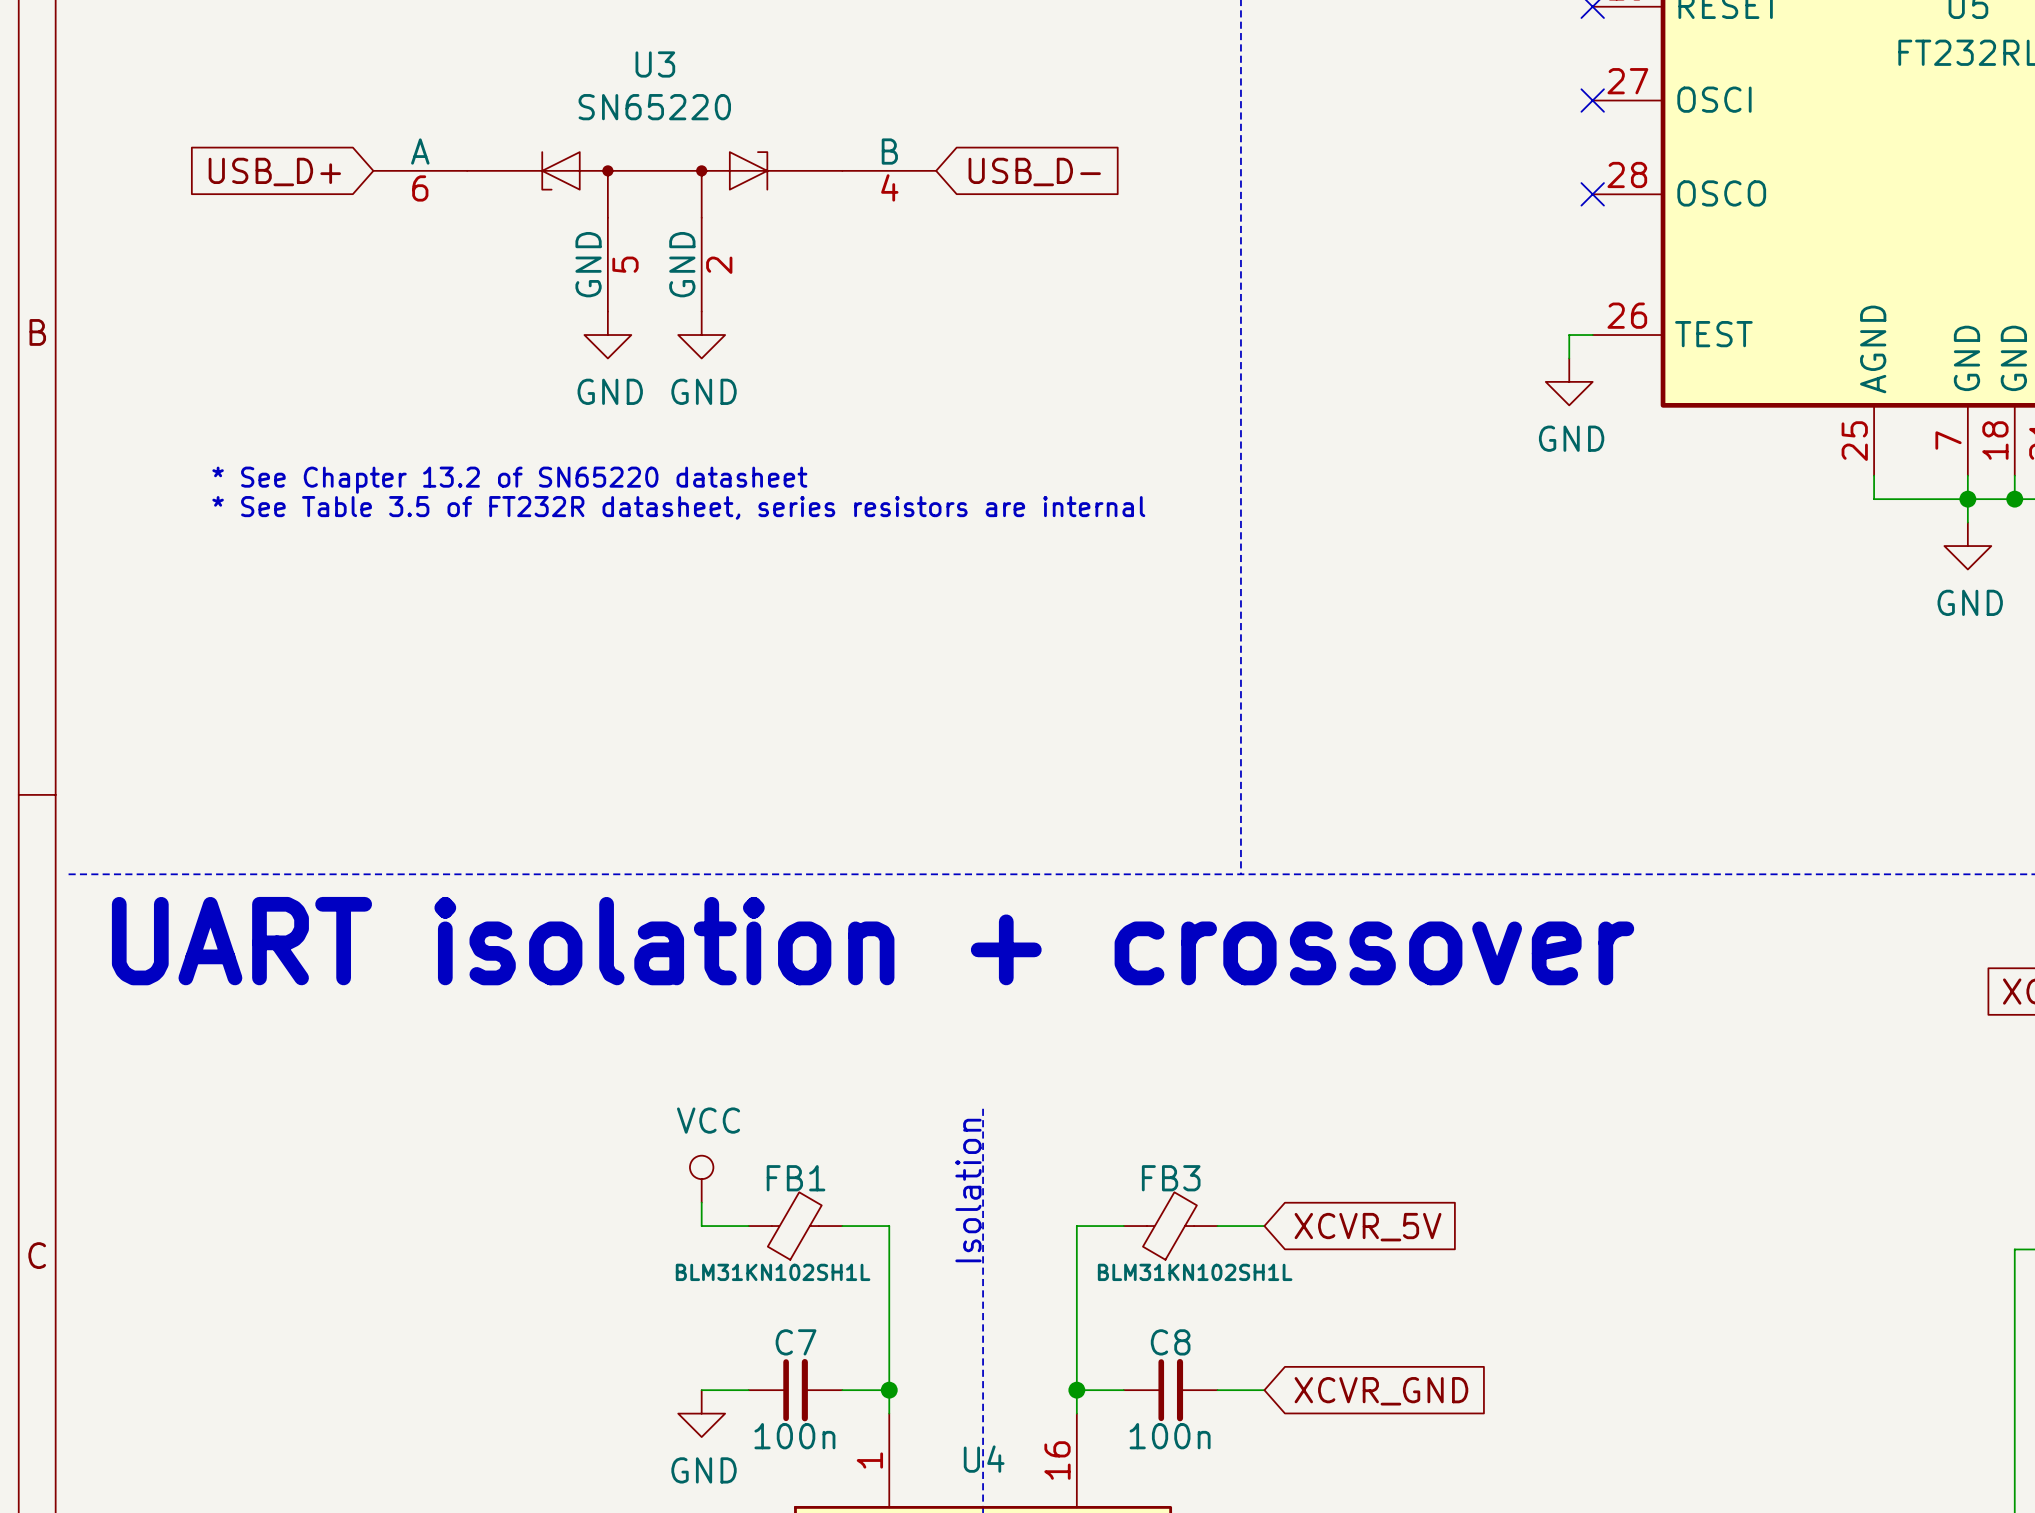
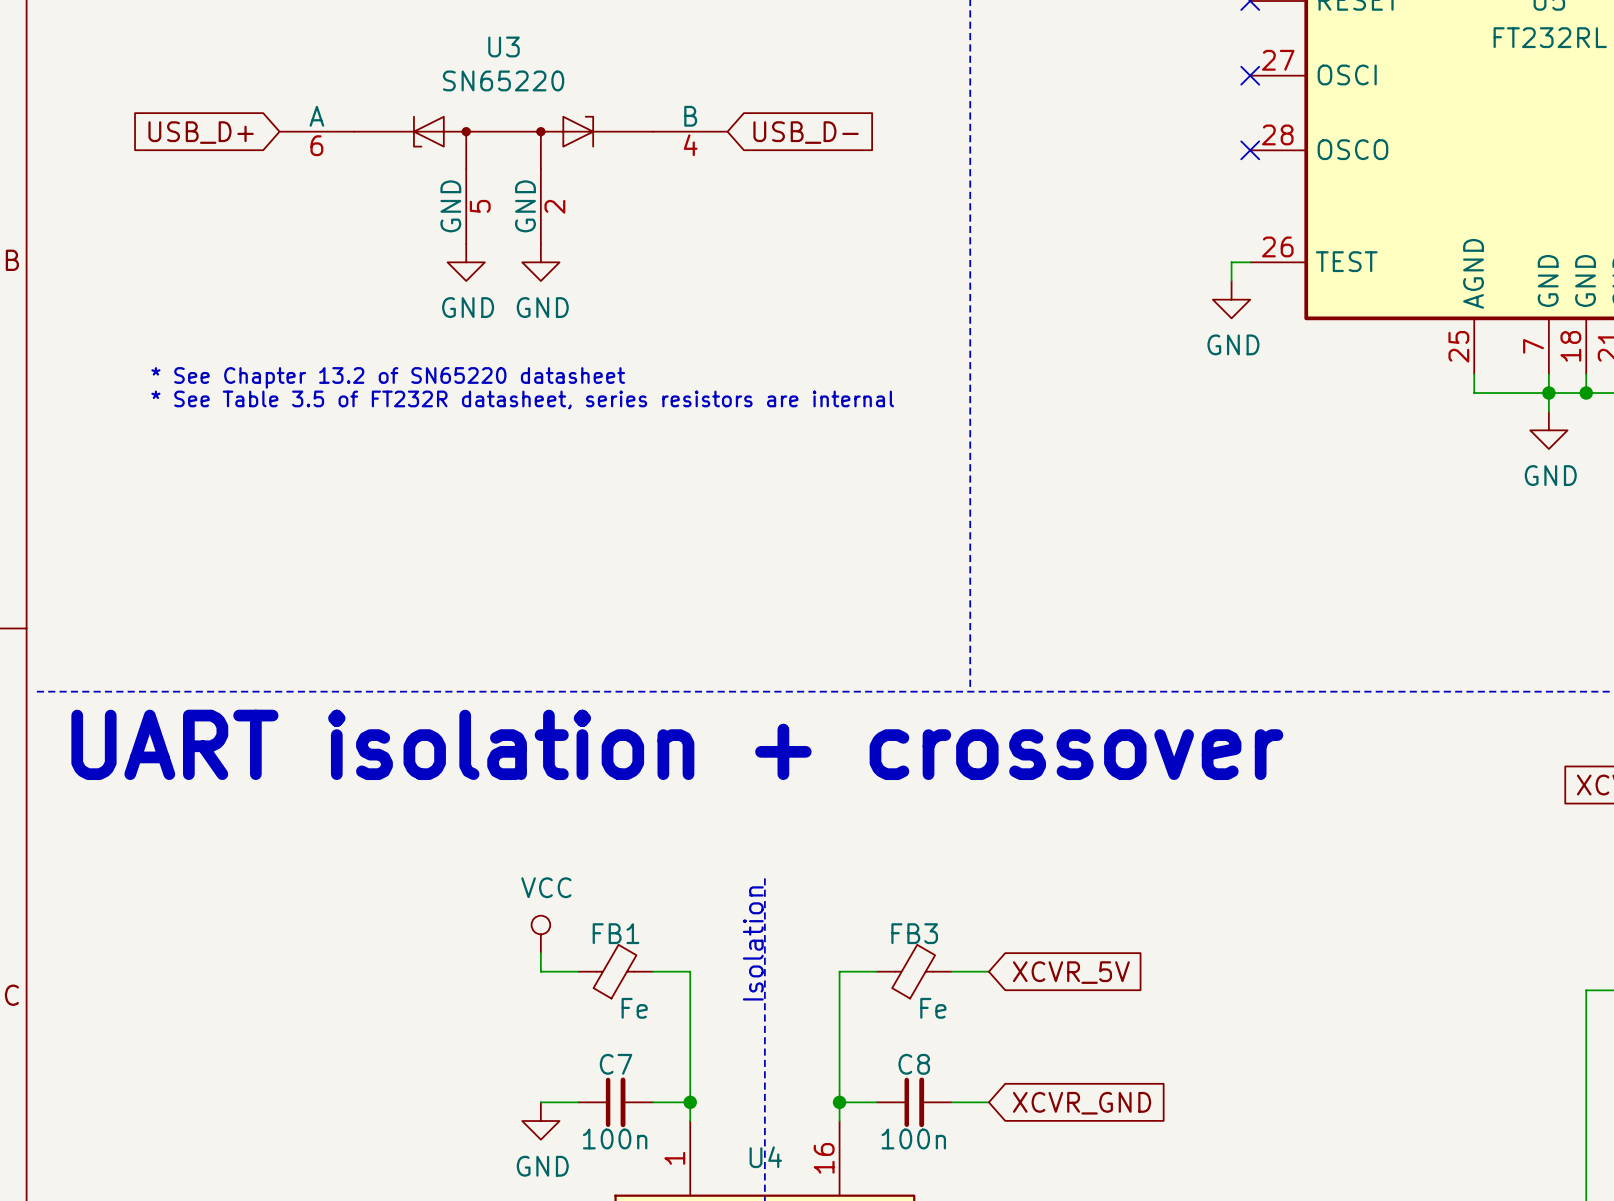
FB1 value: BLM31KN102SH1L (773, 1272) -> Fe (634, 1008)
FB3 value: BLM31KN102SH1L (1195, 1272) -> Fe (933, 1008)

